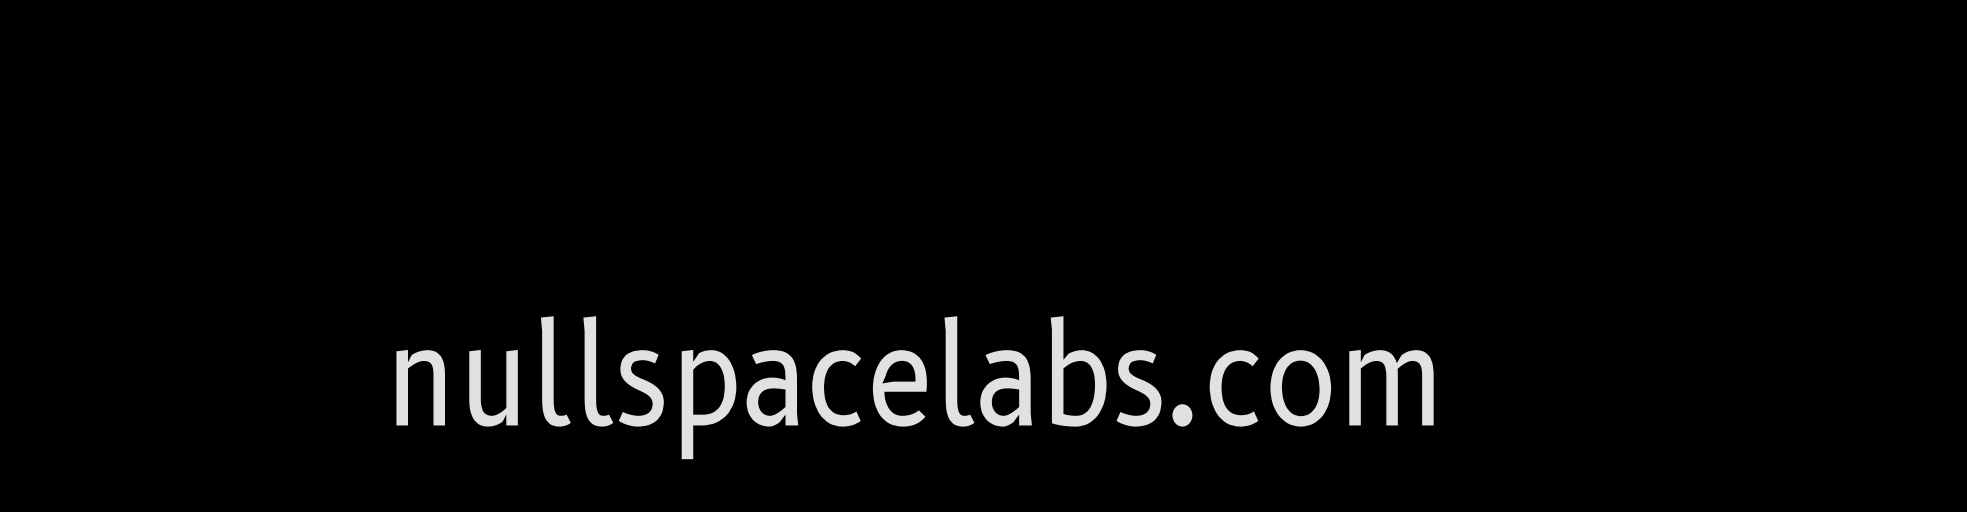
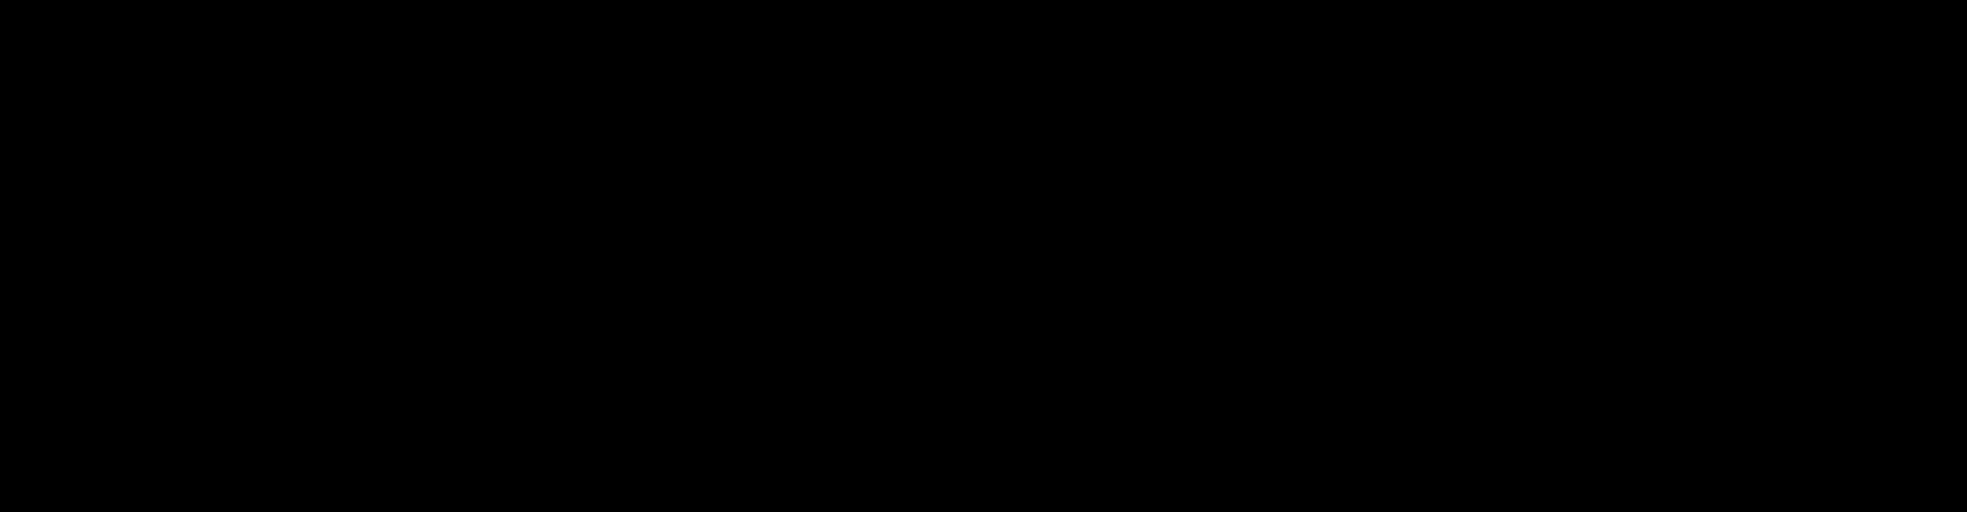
text: nullspacelabs.com (915, 387) -> none

